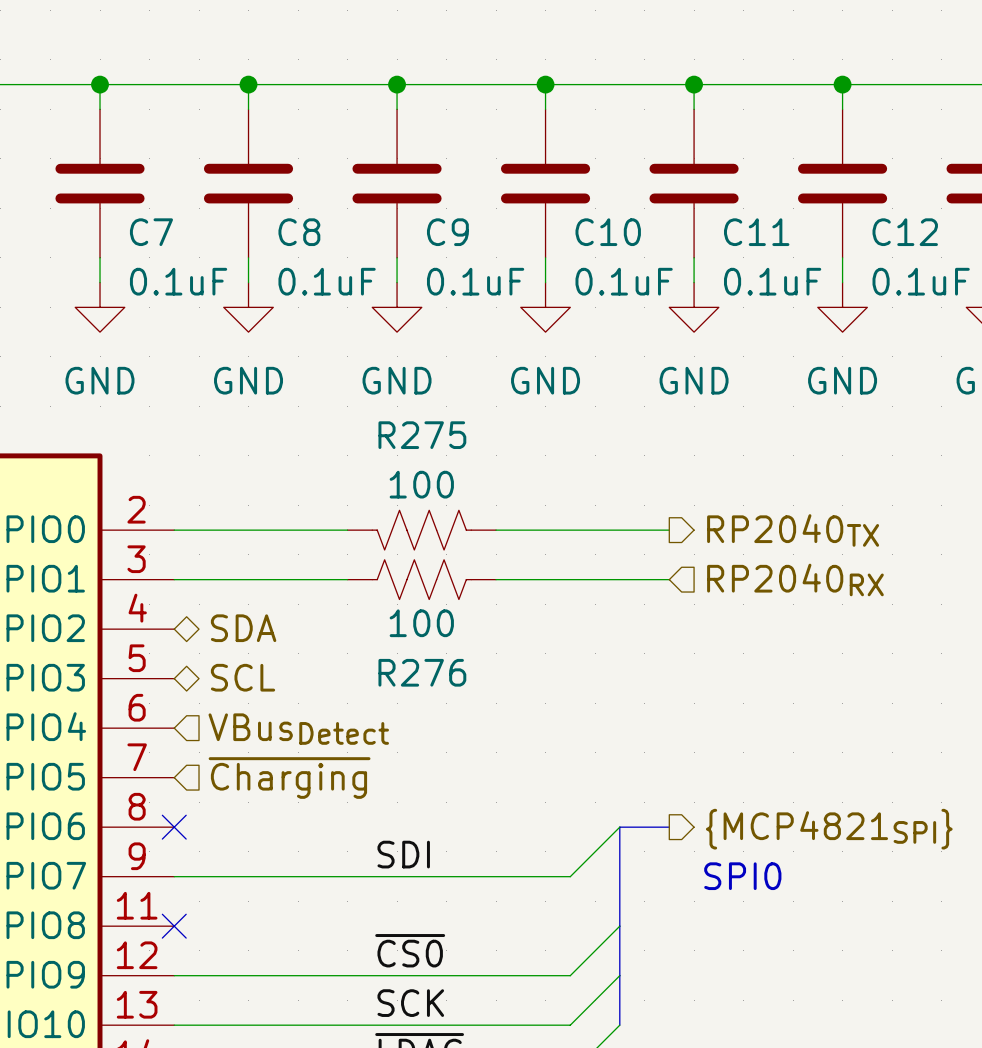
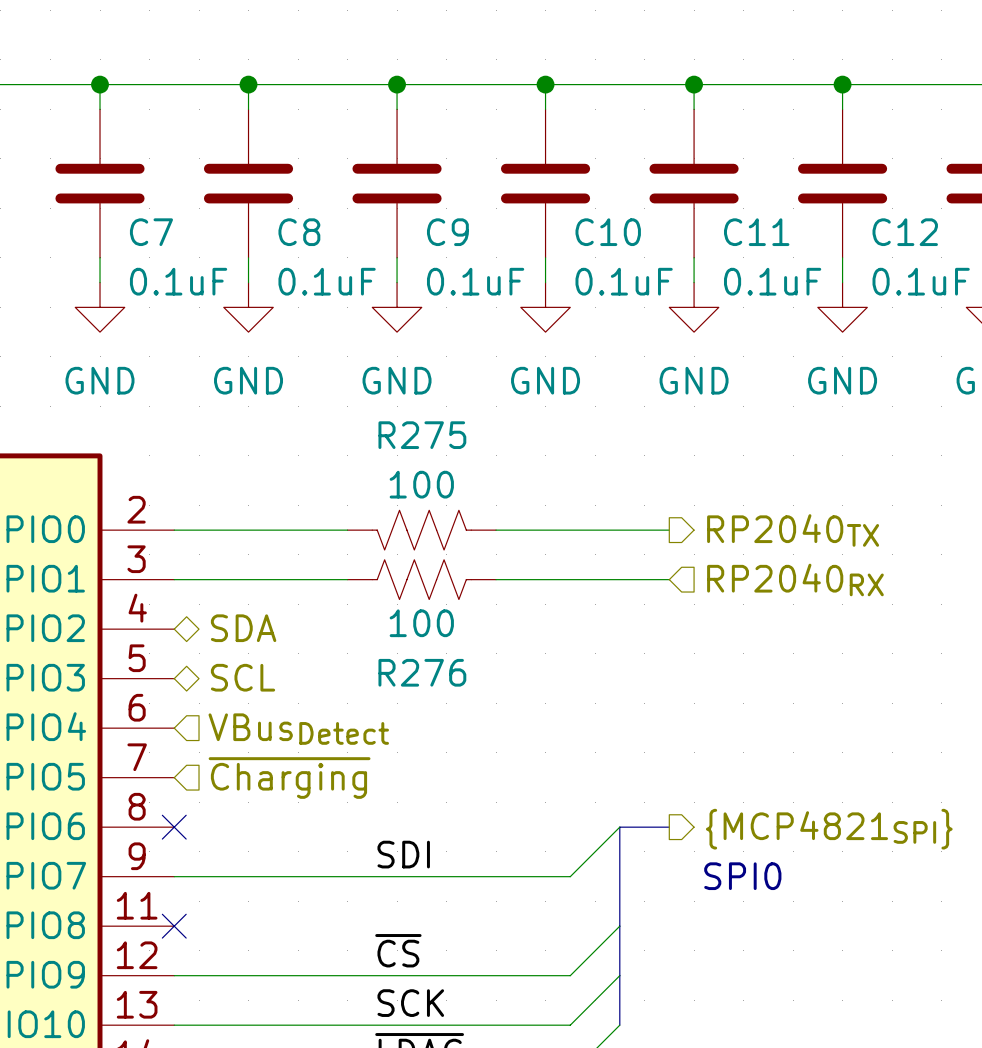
label: ~{CS0} (410, 950) -> ~{CS} (398, 950)

